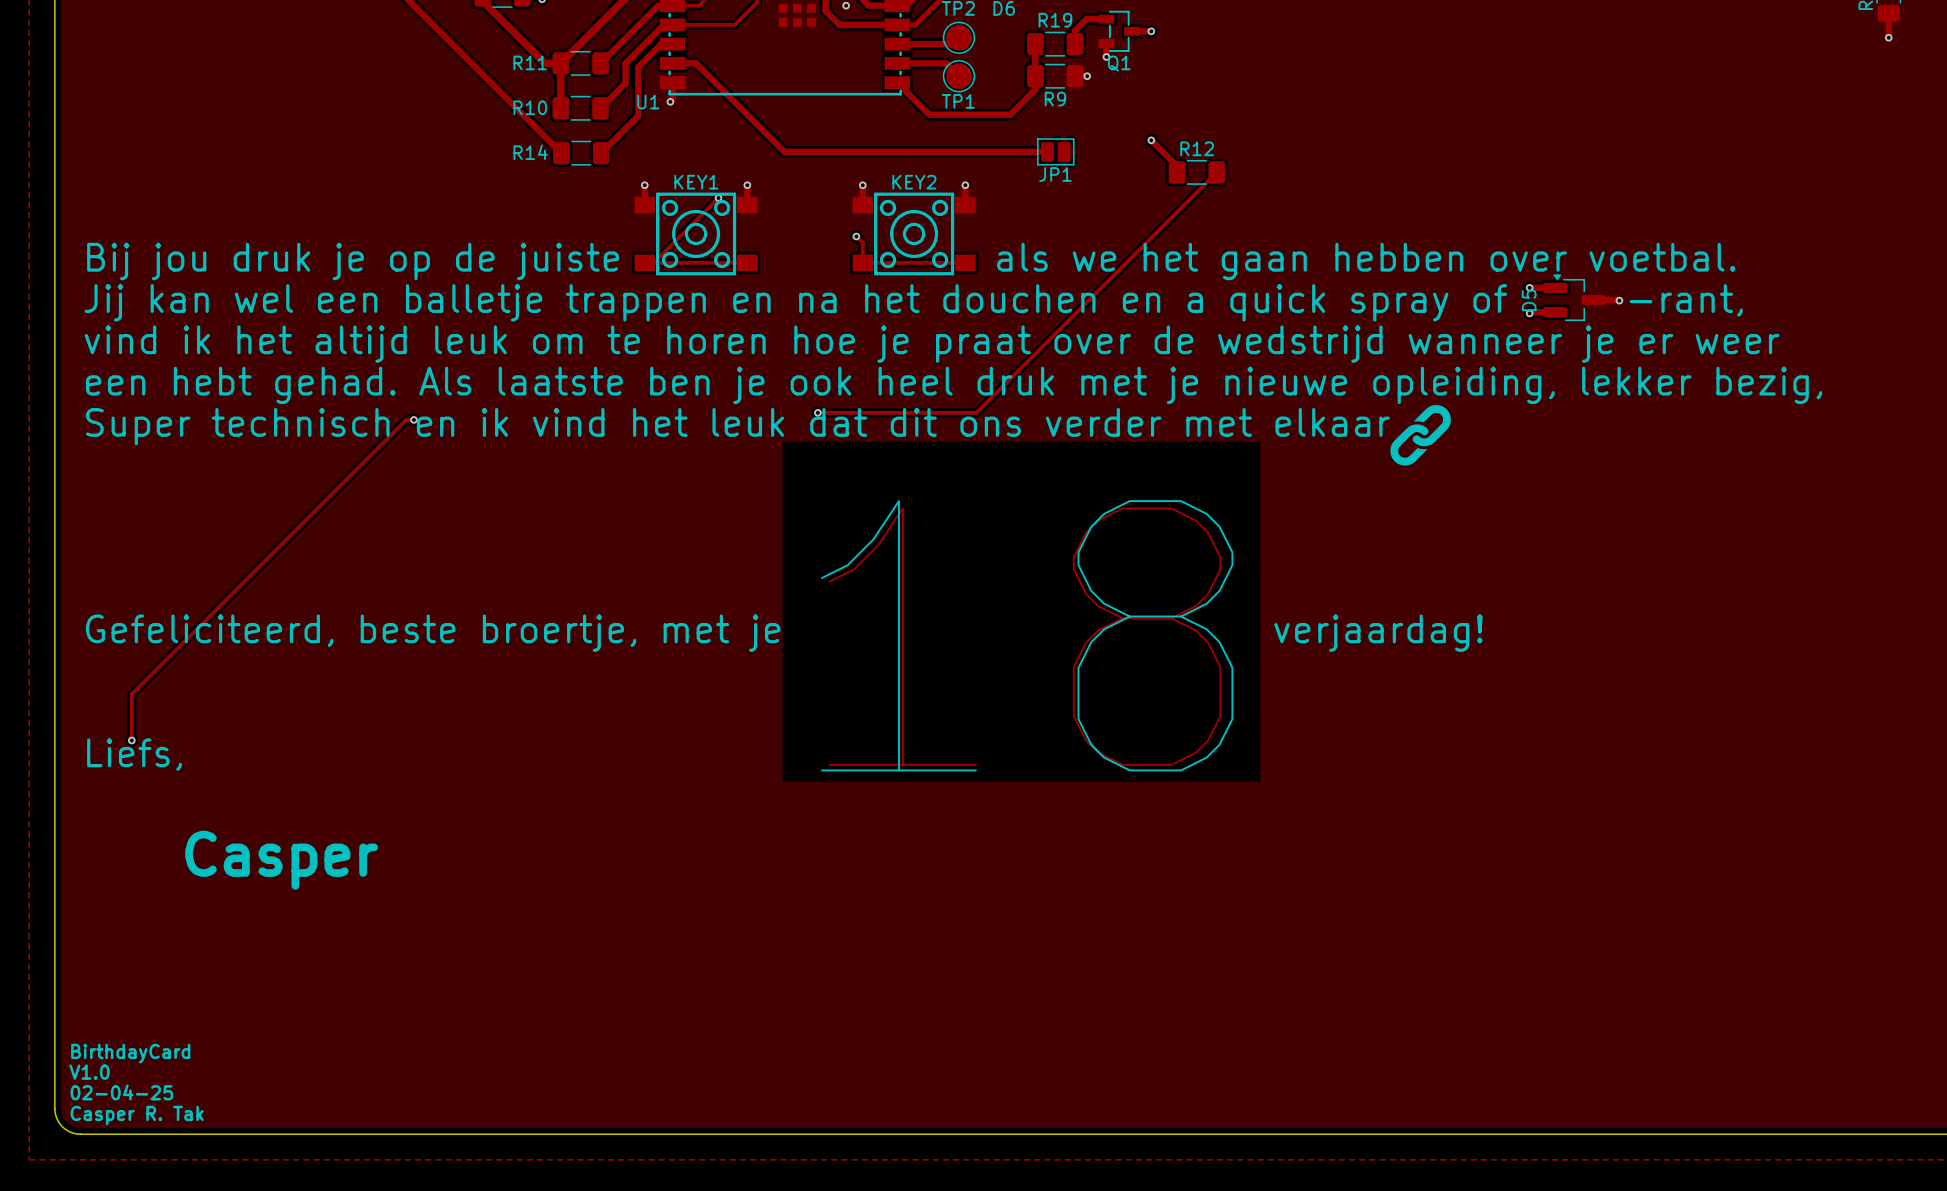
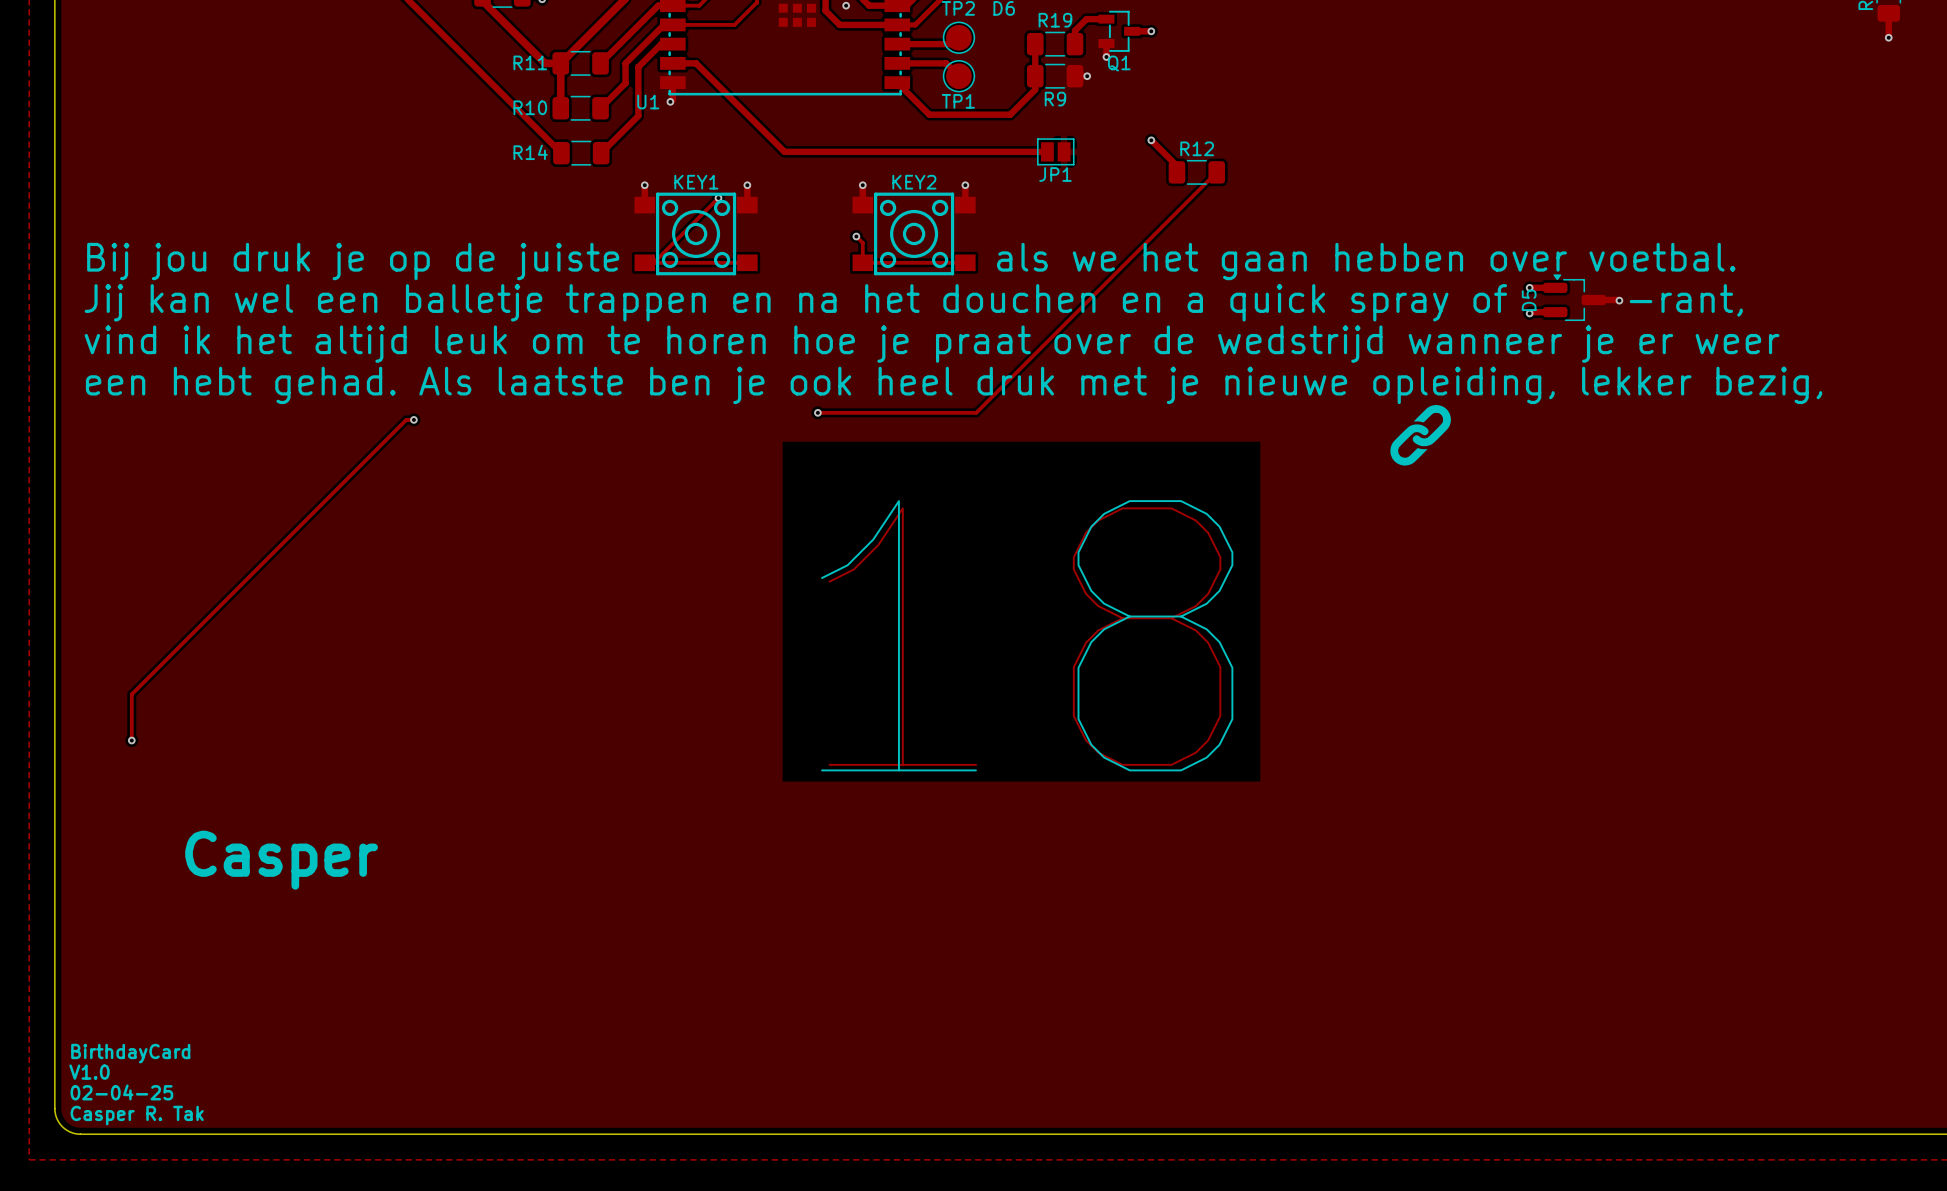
text: Super technisch en ik vind het leuk dat dit ons verder met elkaar (737, 426) -> none
text: Gefeliciteerd, beste broertje, met je verjaardag! (784, 633) -> none
text: Liefs, (134, 754) -> none

